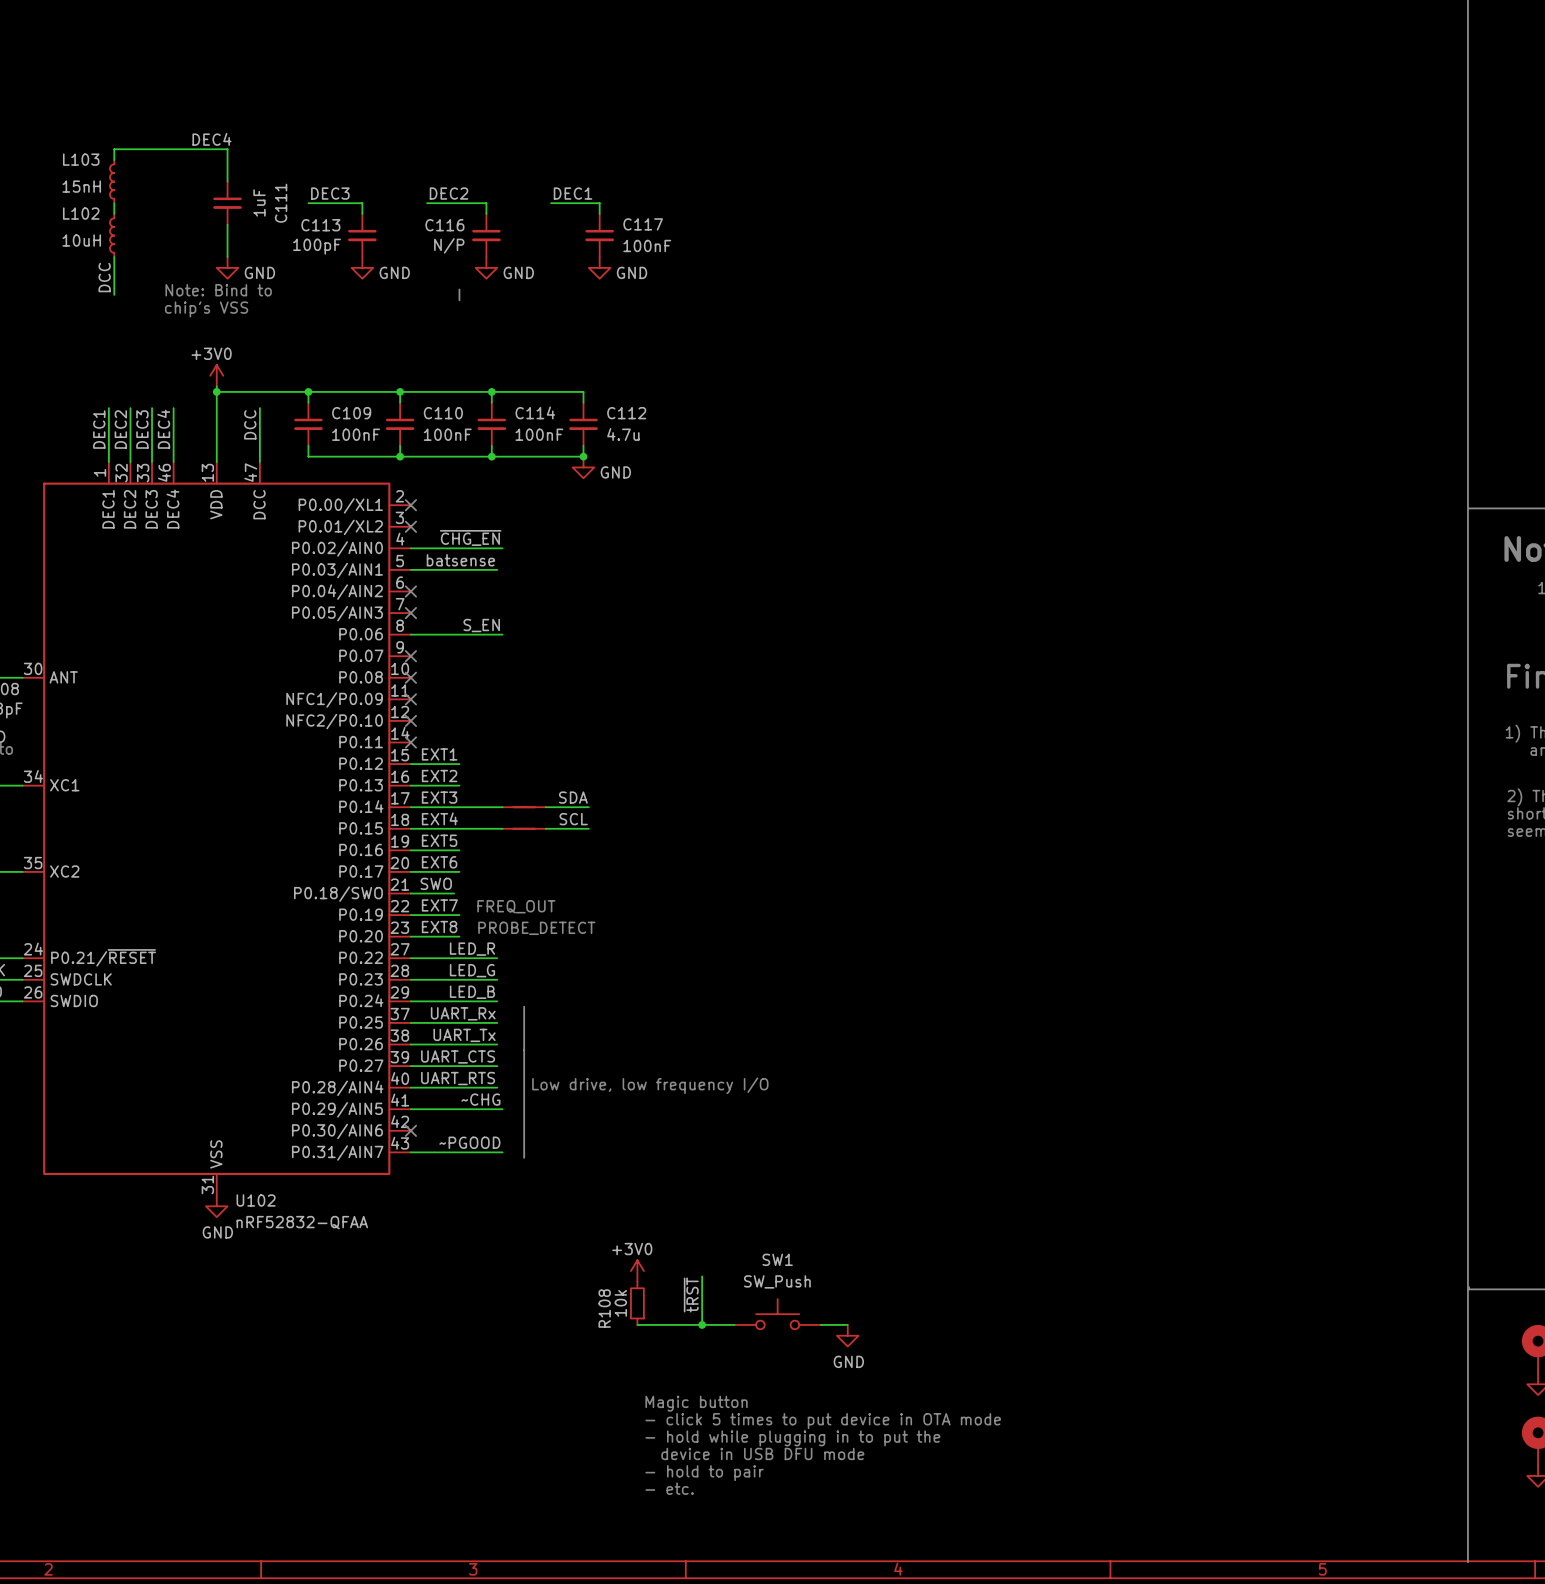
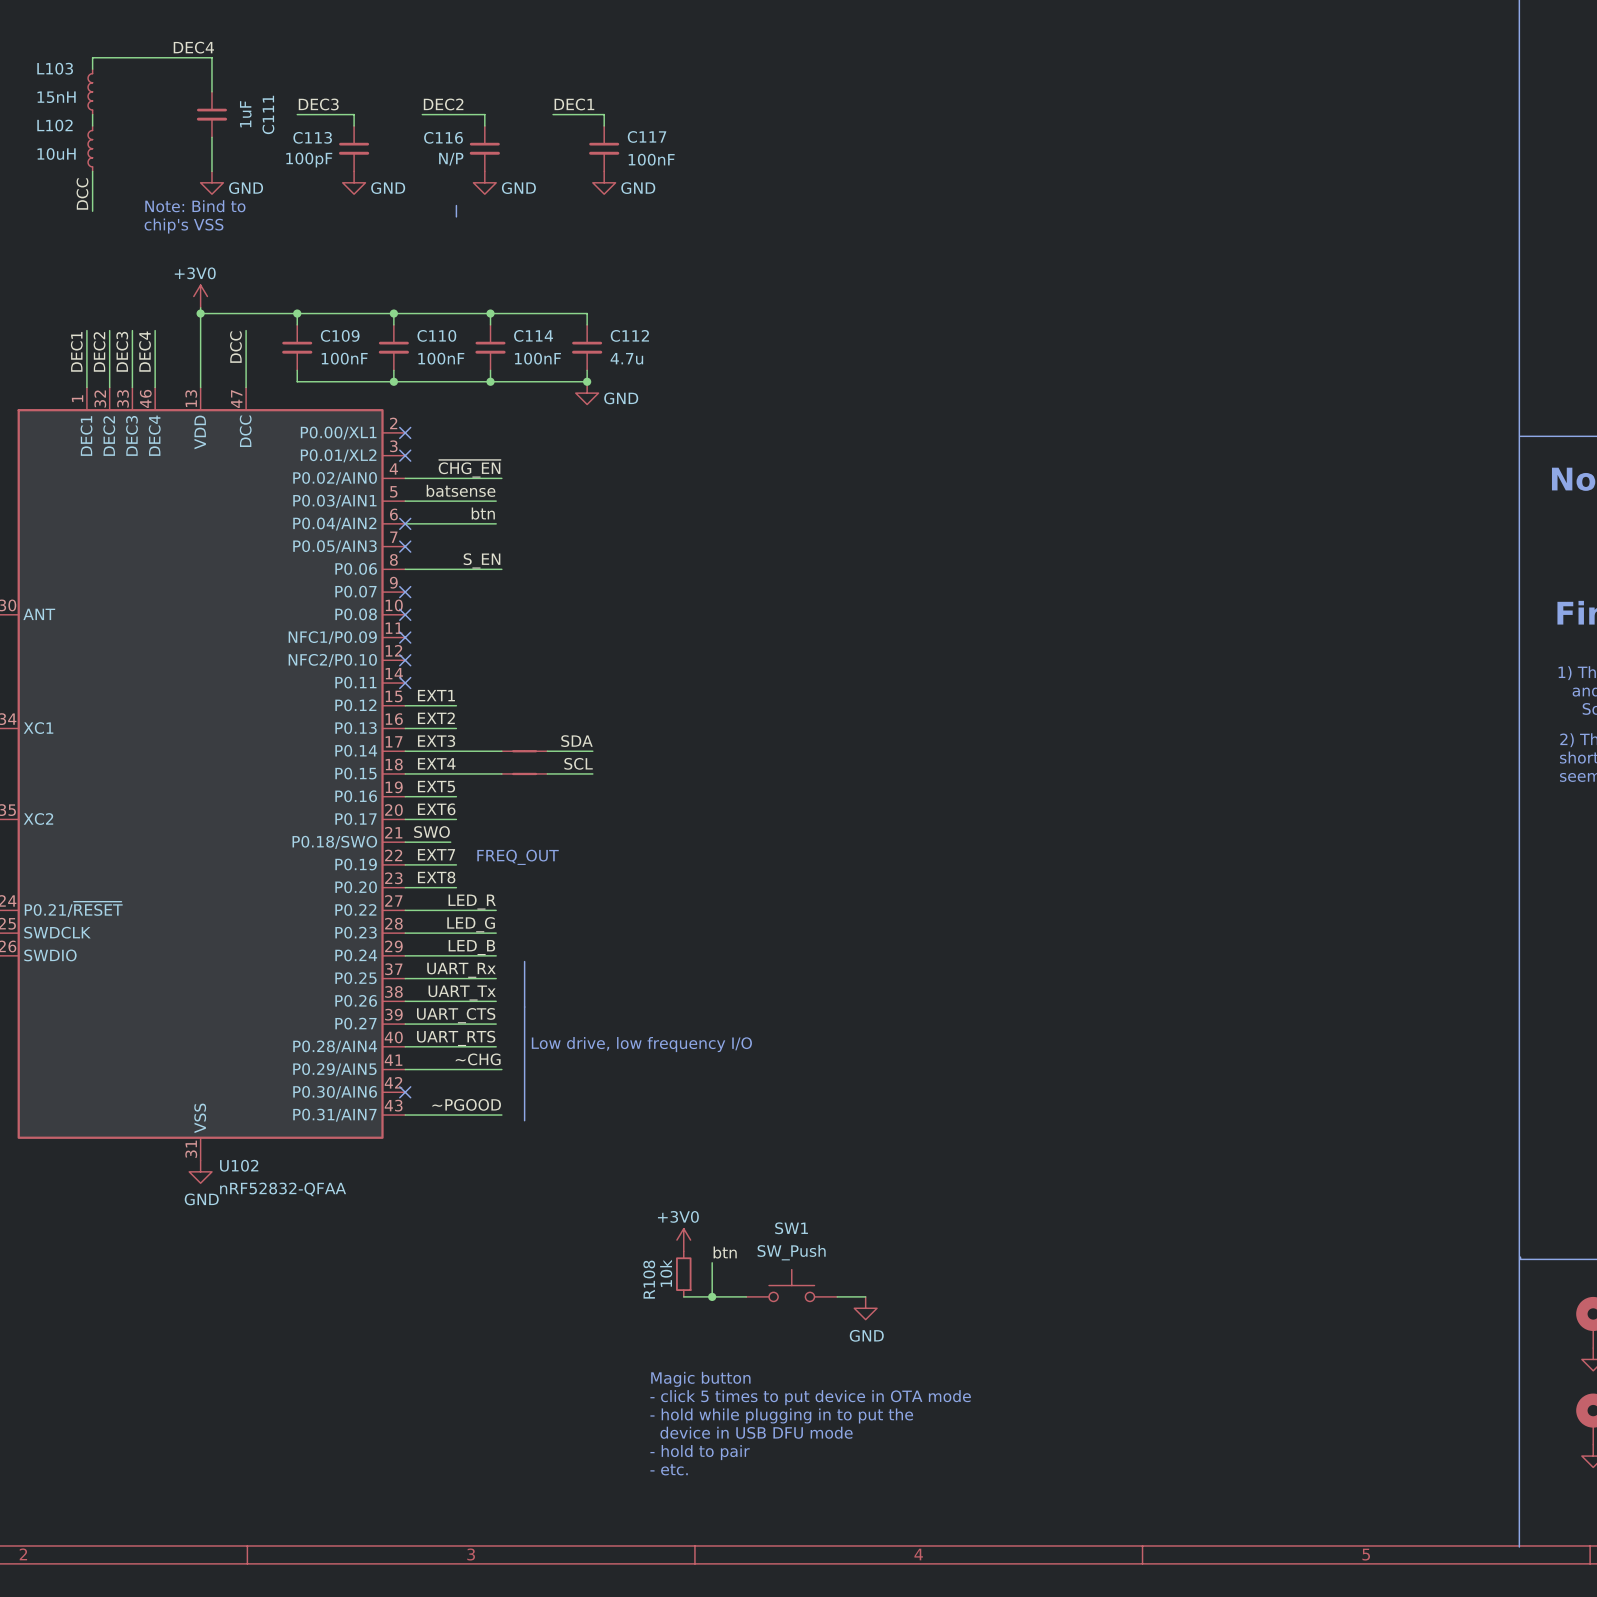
label: none -> btn (483, 513)
wire: none -> (405, 523) (496, 523)
text: PROBE_DETECT (536, 928) -> none
power symbol position: +3V0 (637, 1271) -> +3V0 (683, 1240)
wire: (702, 1276) (702, 1292) -> none
label: none -> btn (725, 1252)
label: ~{tRST} (691, 1294) -> none
R108 position: (637, 1303) -> (683, 1274)
wire: (637, 1324) (675, 1324) -> none

